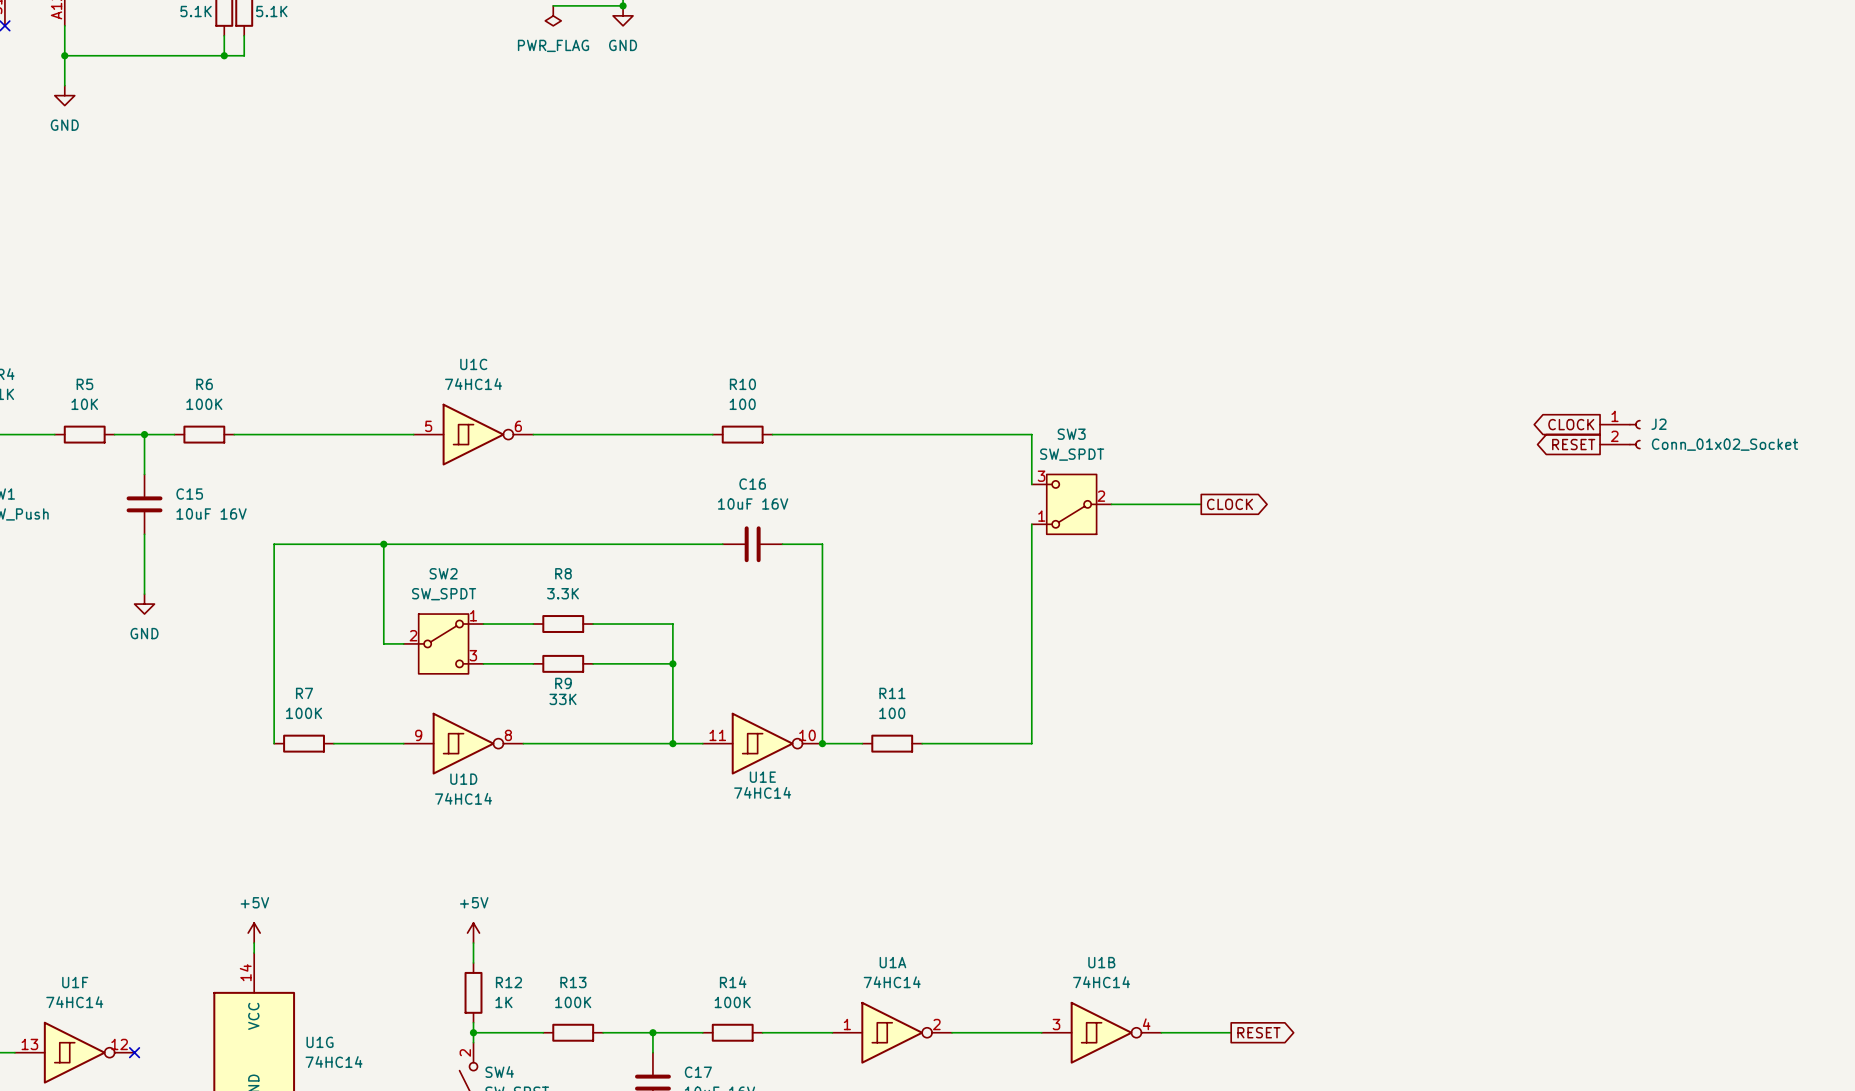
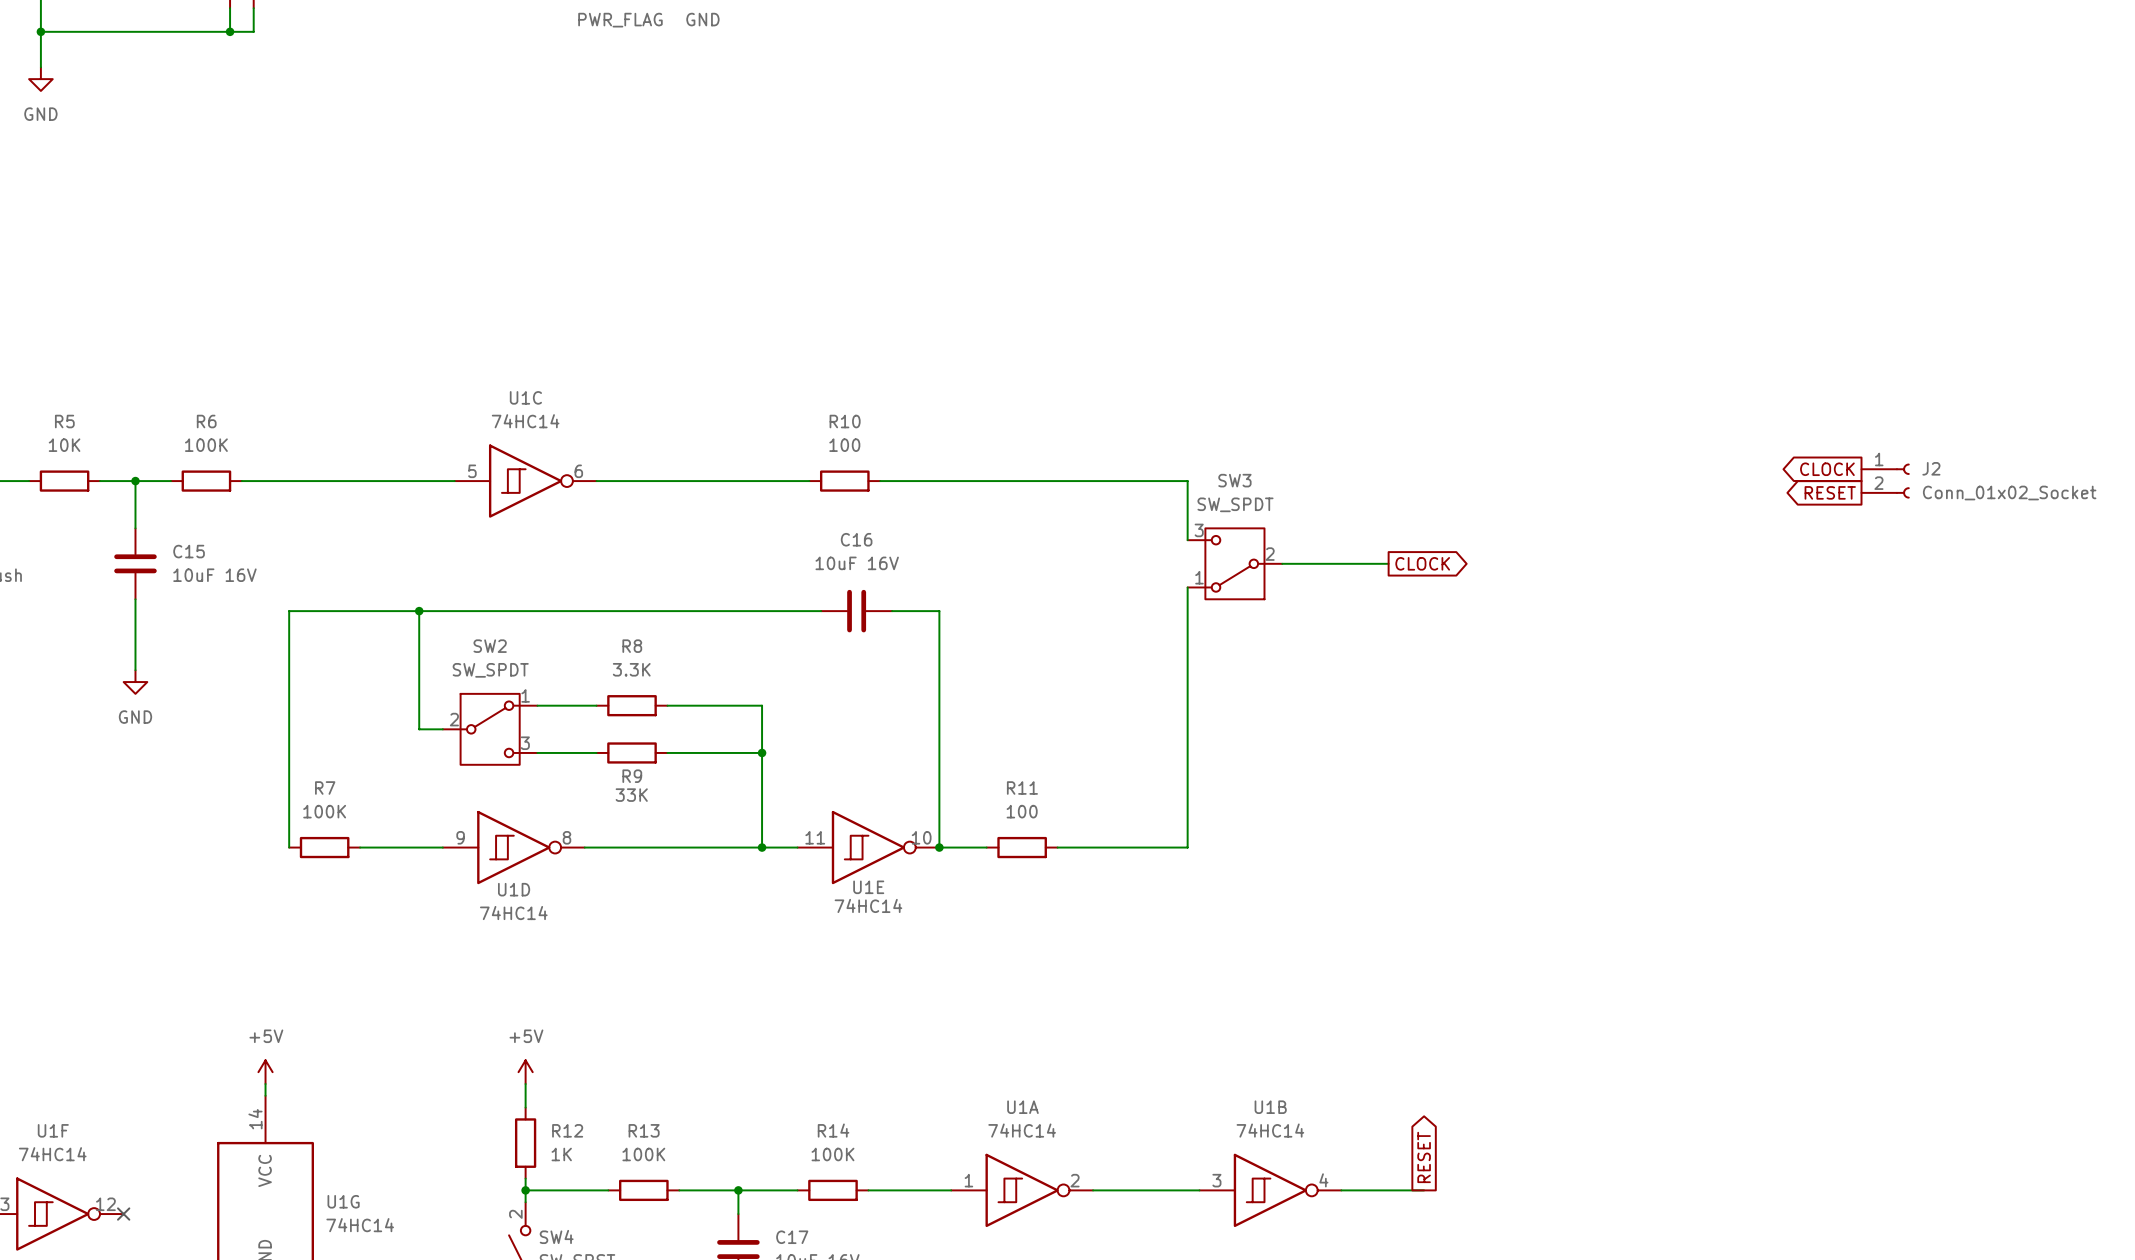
global label rotation: 0° (1258, 1032) -> 90° counterclockwise (1424, 1157)

